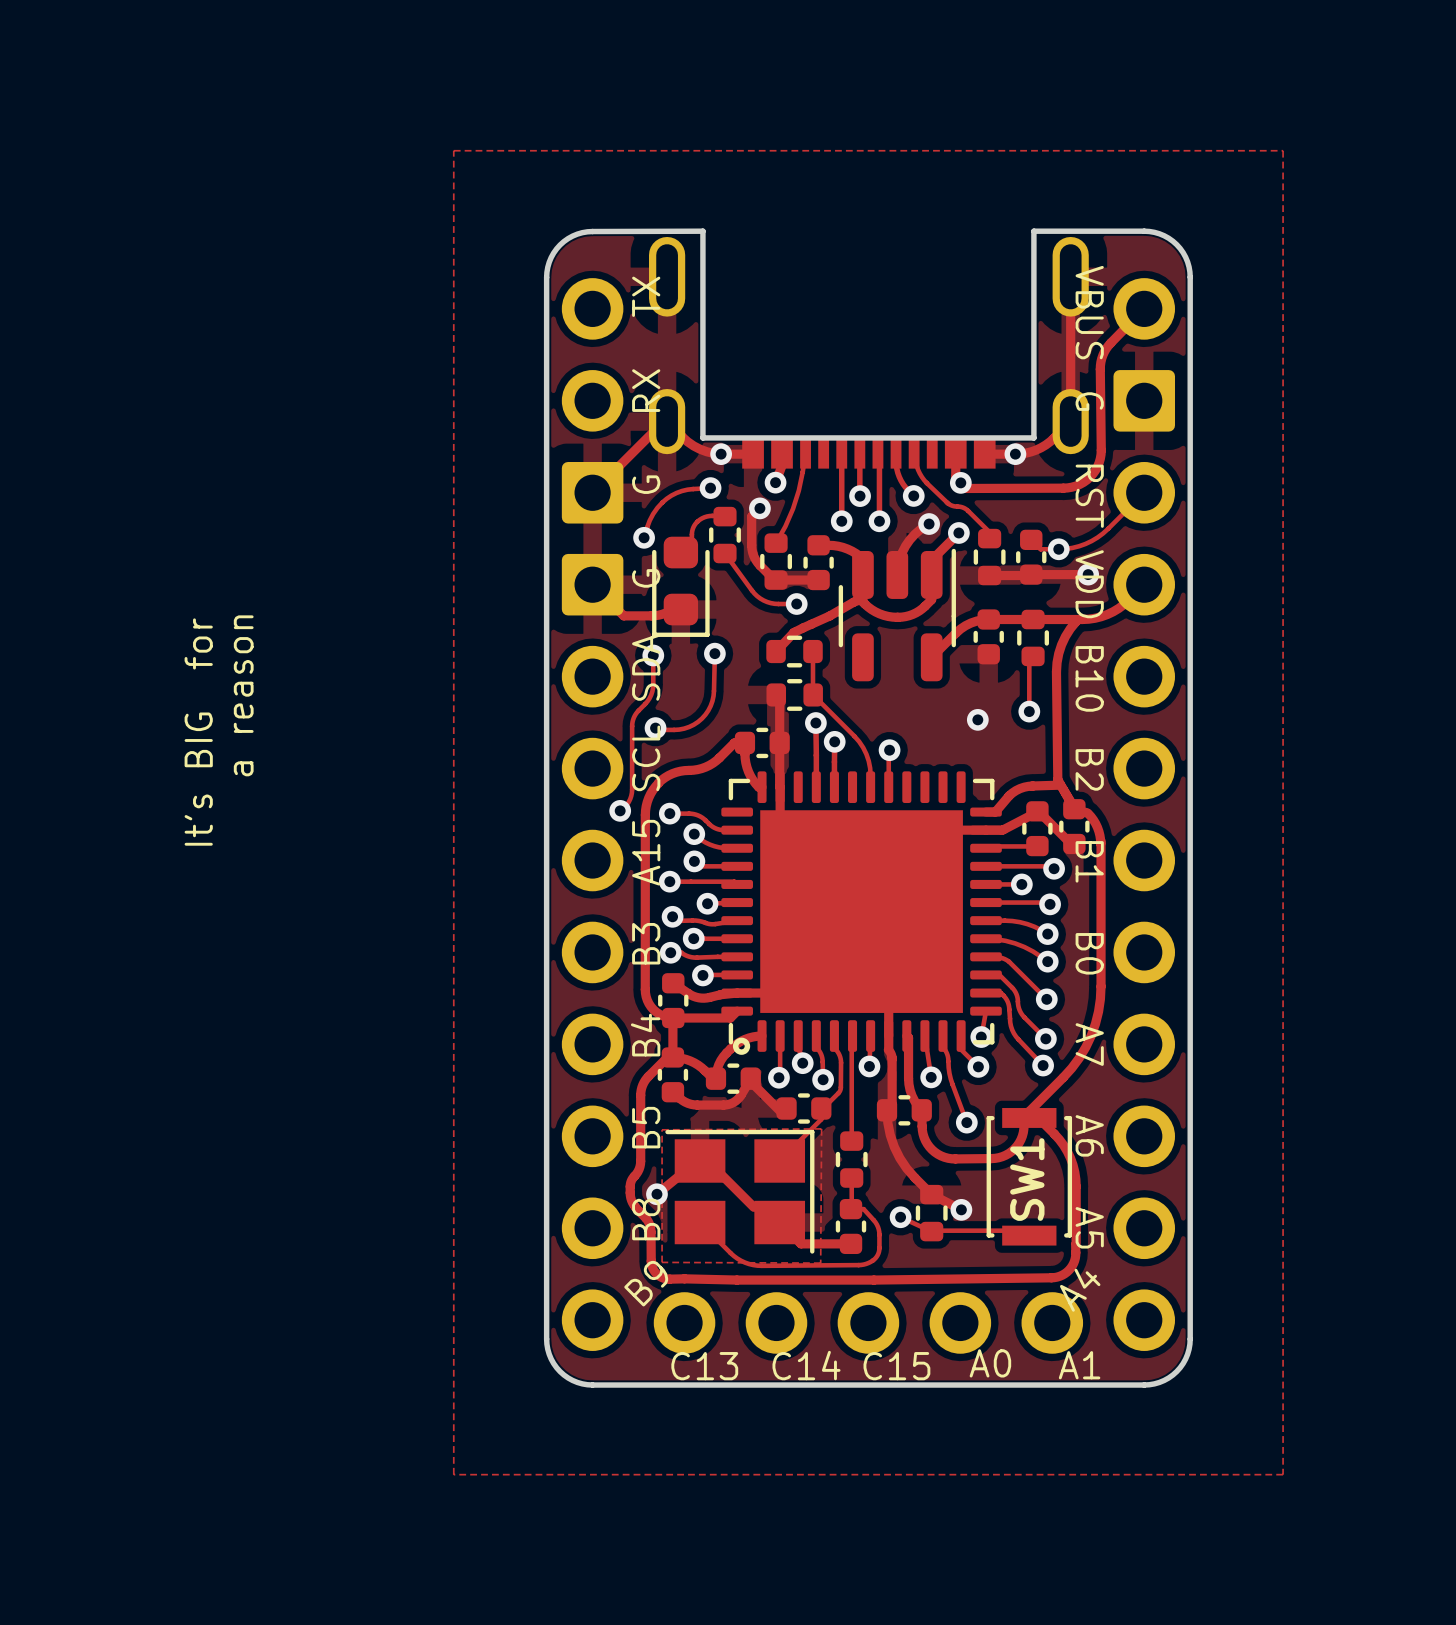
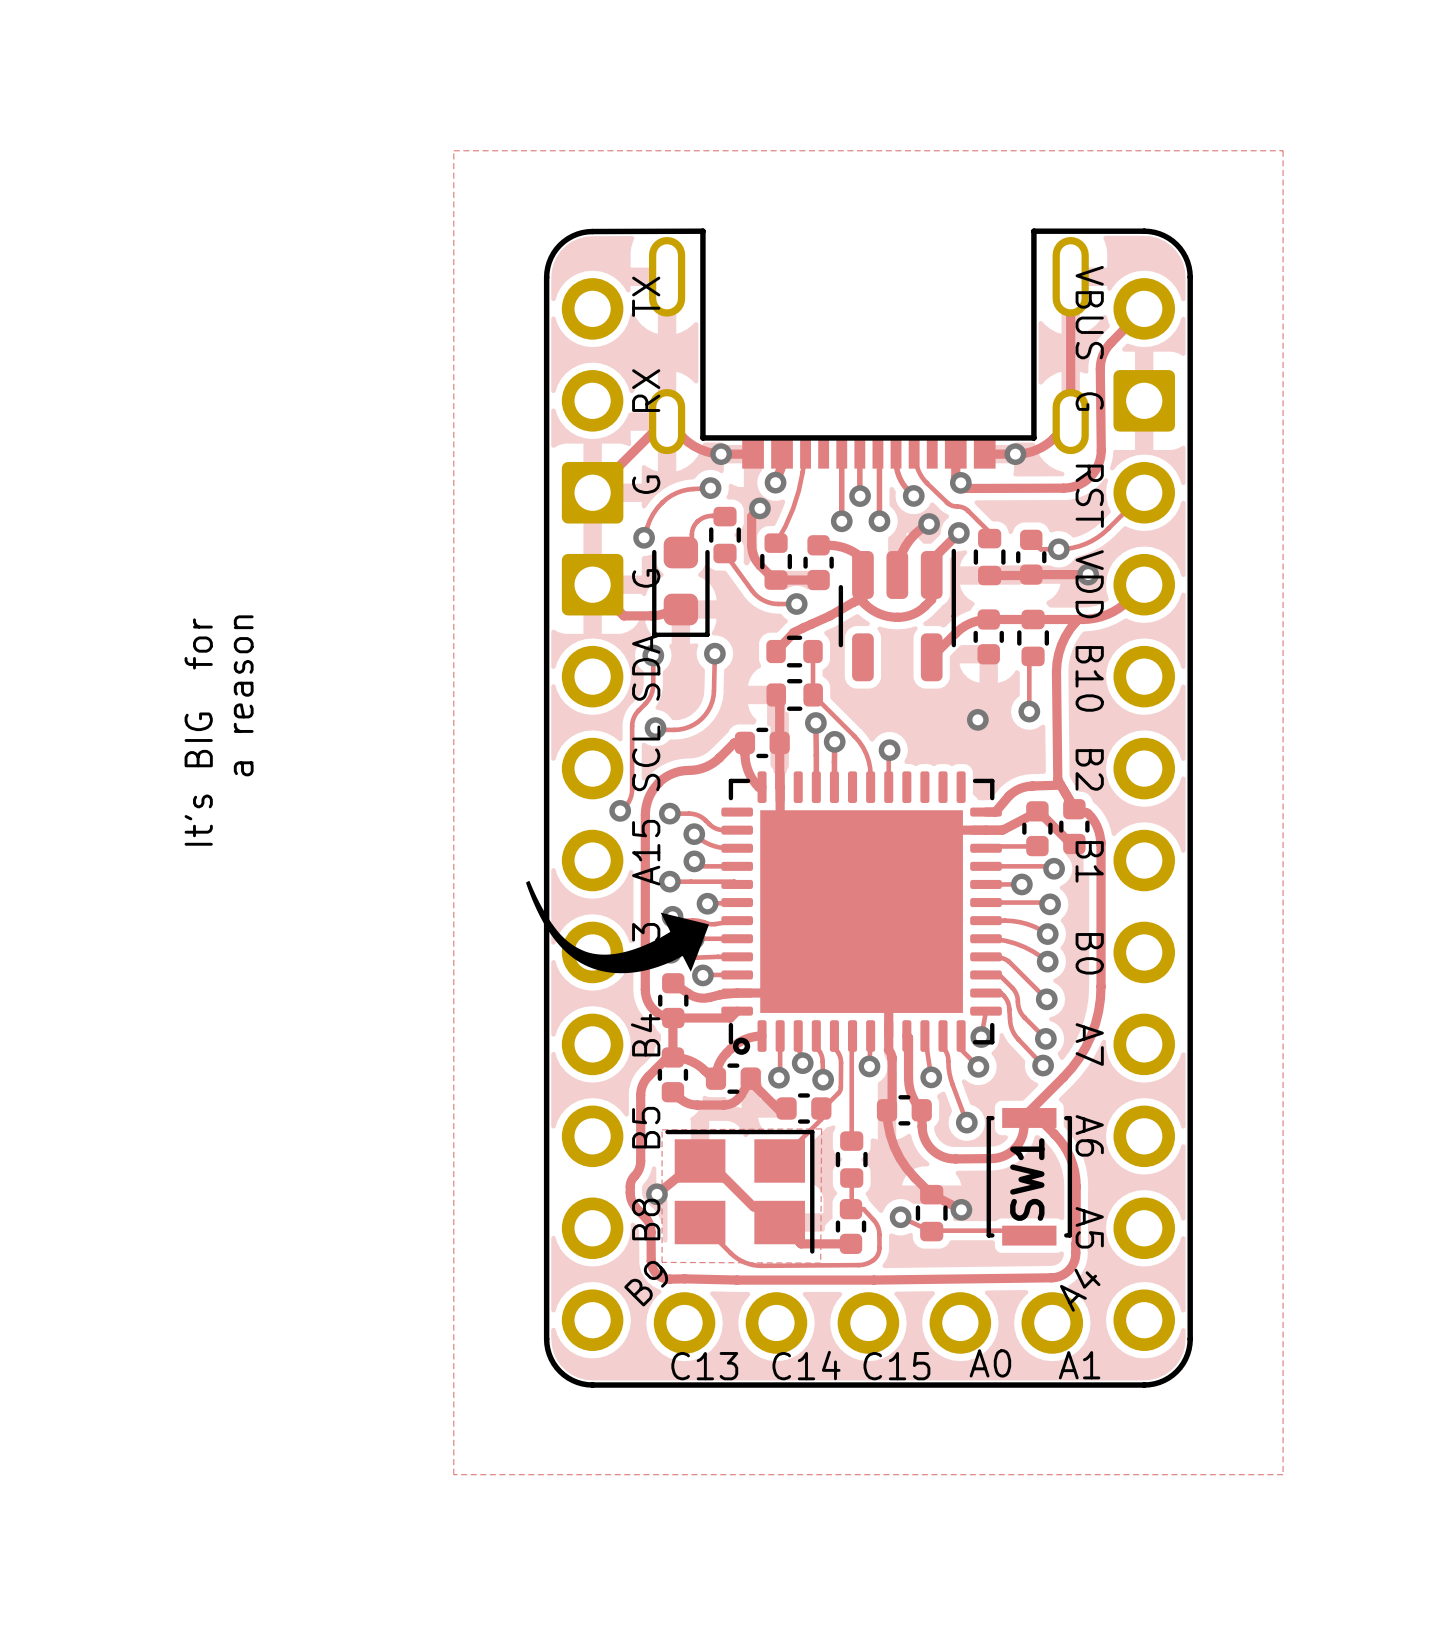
drawing: none -> [525, 880, 709, 974]

